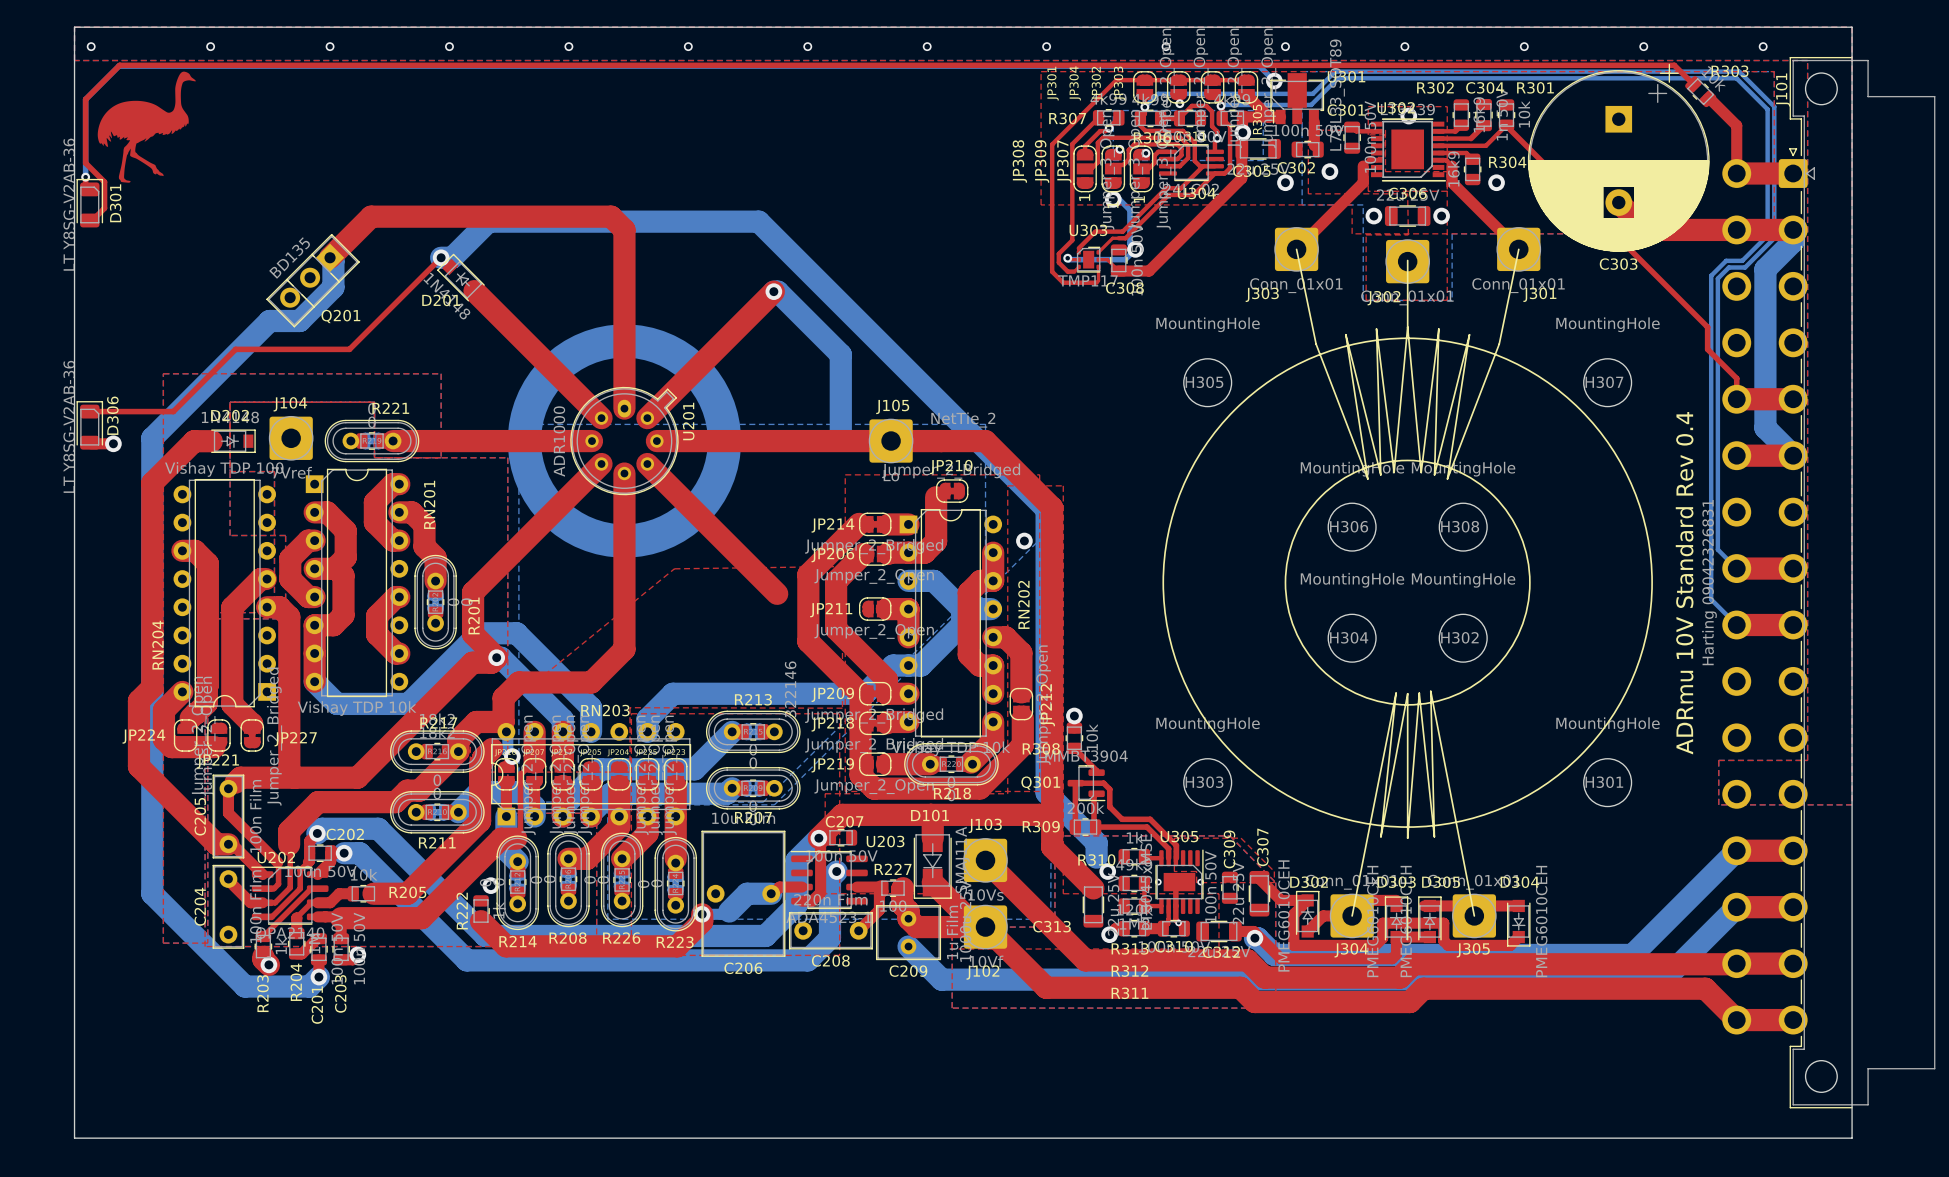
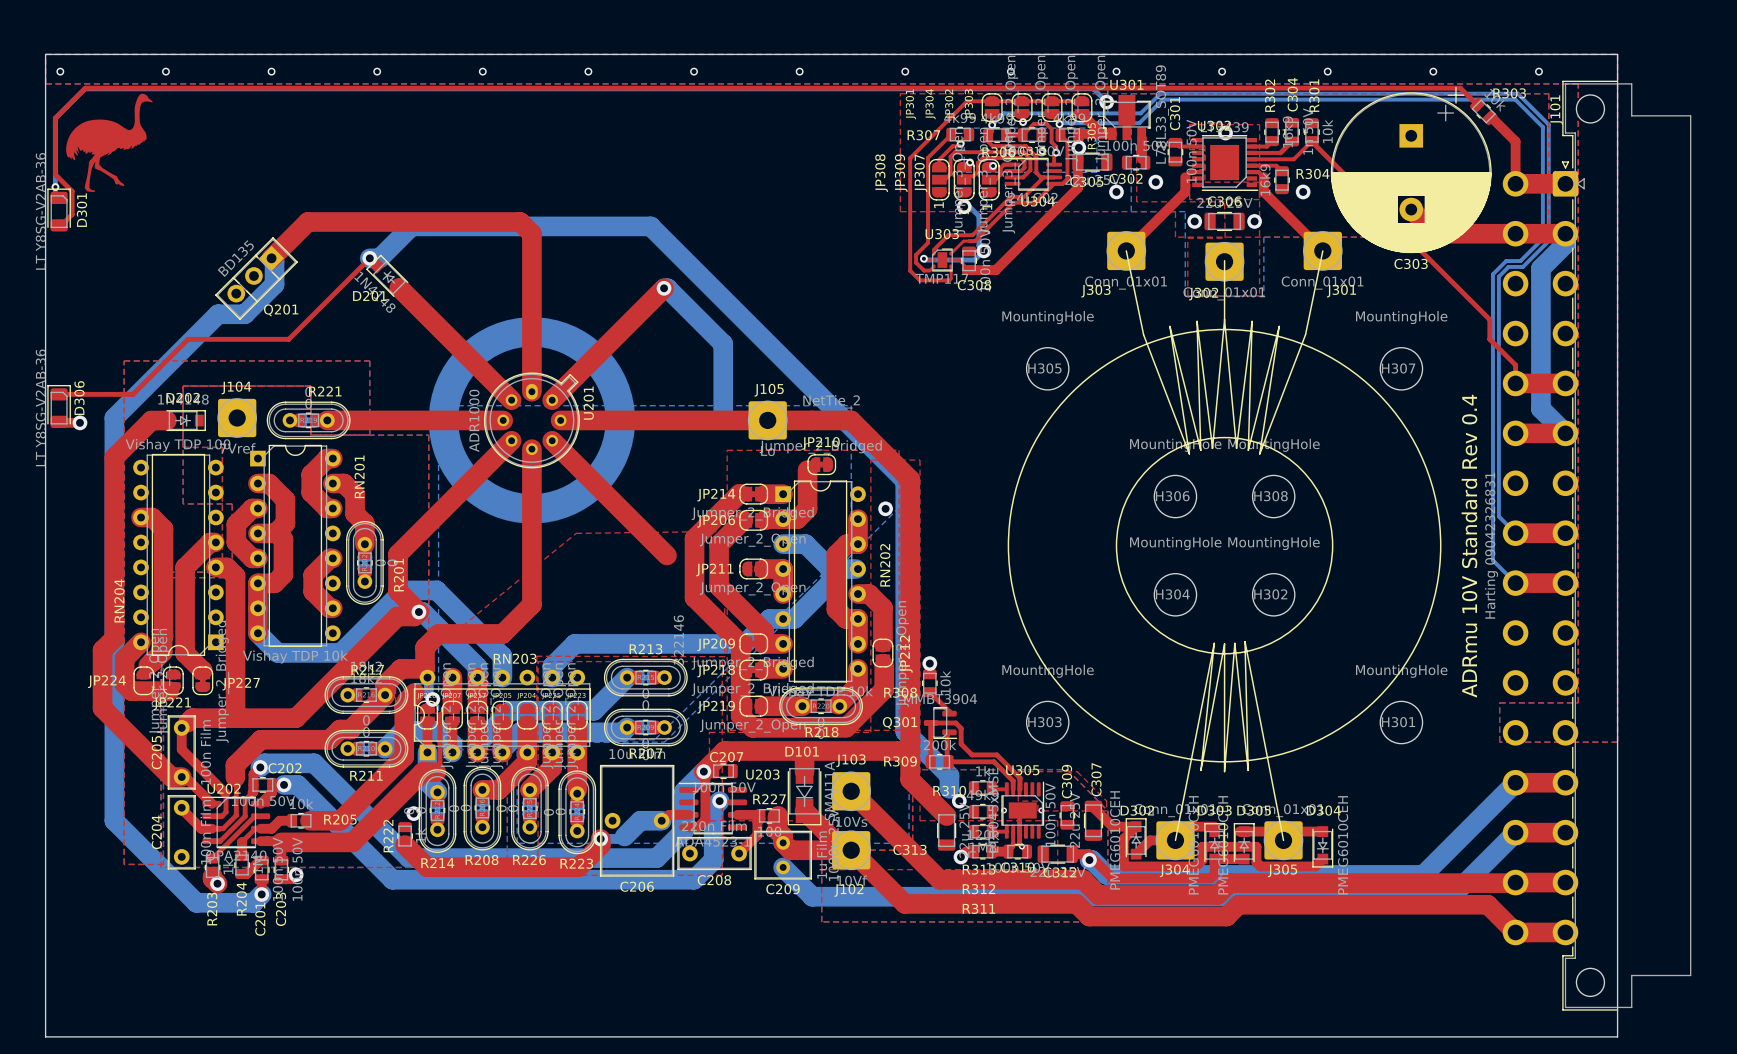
U301 name position: U301 (1346, 76) -> U301 (1126, 84)
R302 name rotation: 0° (1435, 87) -> 90° counterclockwise (1270, 95)
C304 name rotation: 0° (1485, 87) -> 90° counterclockwise (1292, 94)
R301 name rotation: 0° (1535, 87) -> 90° counterclockwise (1314, 95)
C301 name rotation: 0° (1346, 110) -> 90° counterclockwise (1175, 113)

